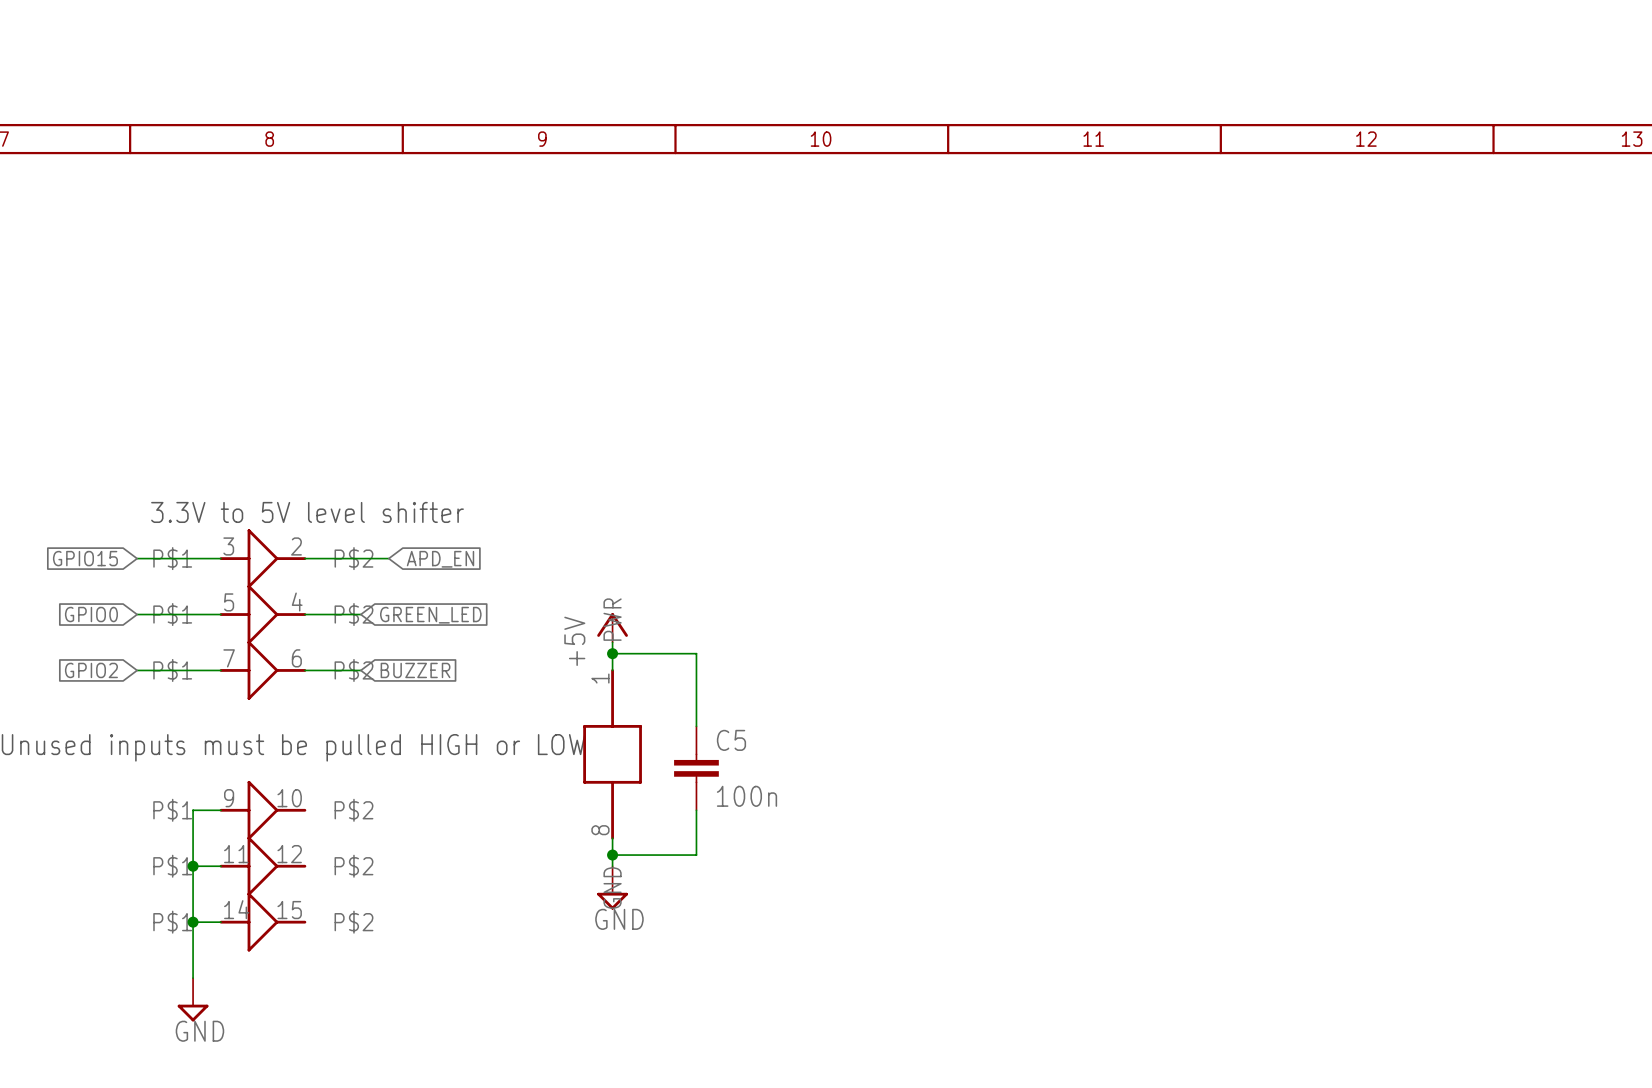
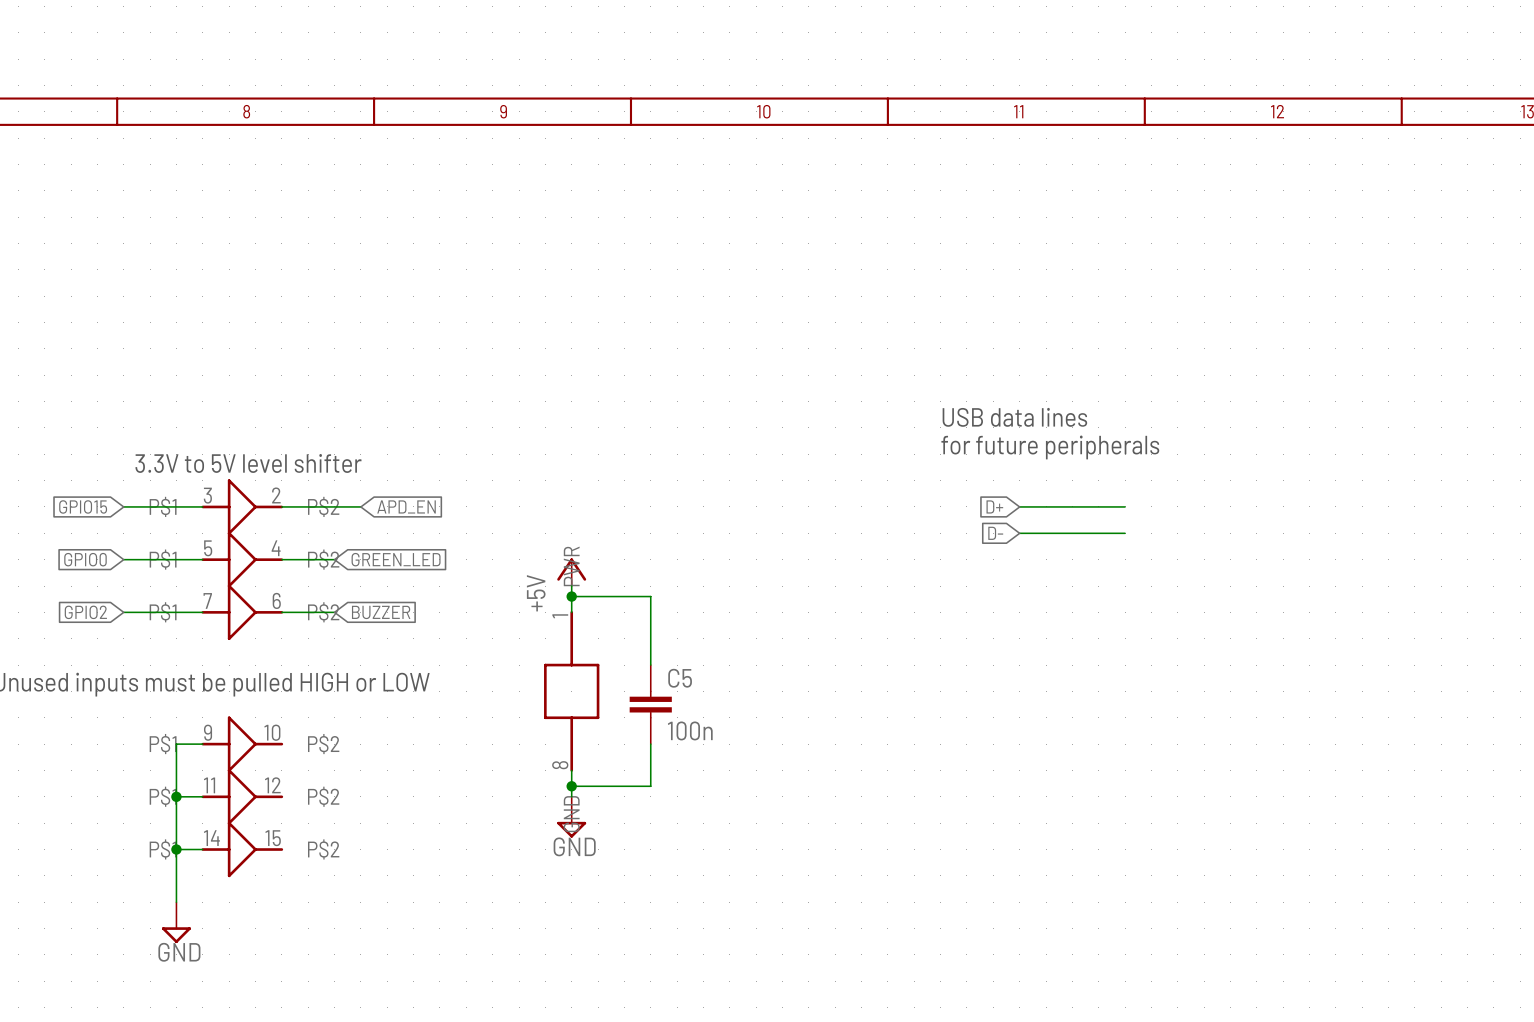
text: none -> USB data lines (1014, 417)
text: none -> for future peripherals (1050, 447)
global label: none -> D+ (994, 506)
wire: none -> (1019, 506) (1125, 506)
global label: none -> D- (995, 533)
wire: none -> (1019, 533) (1125, 533)

